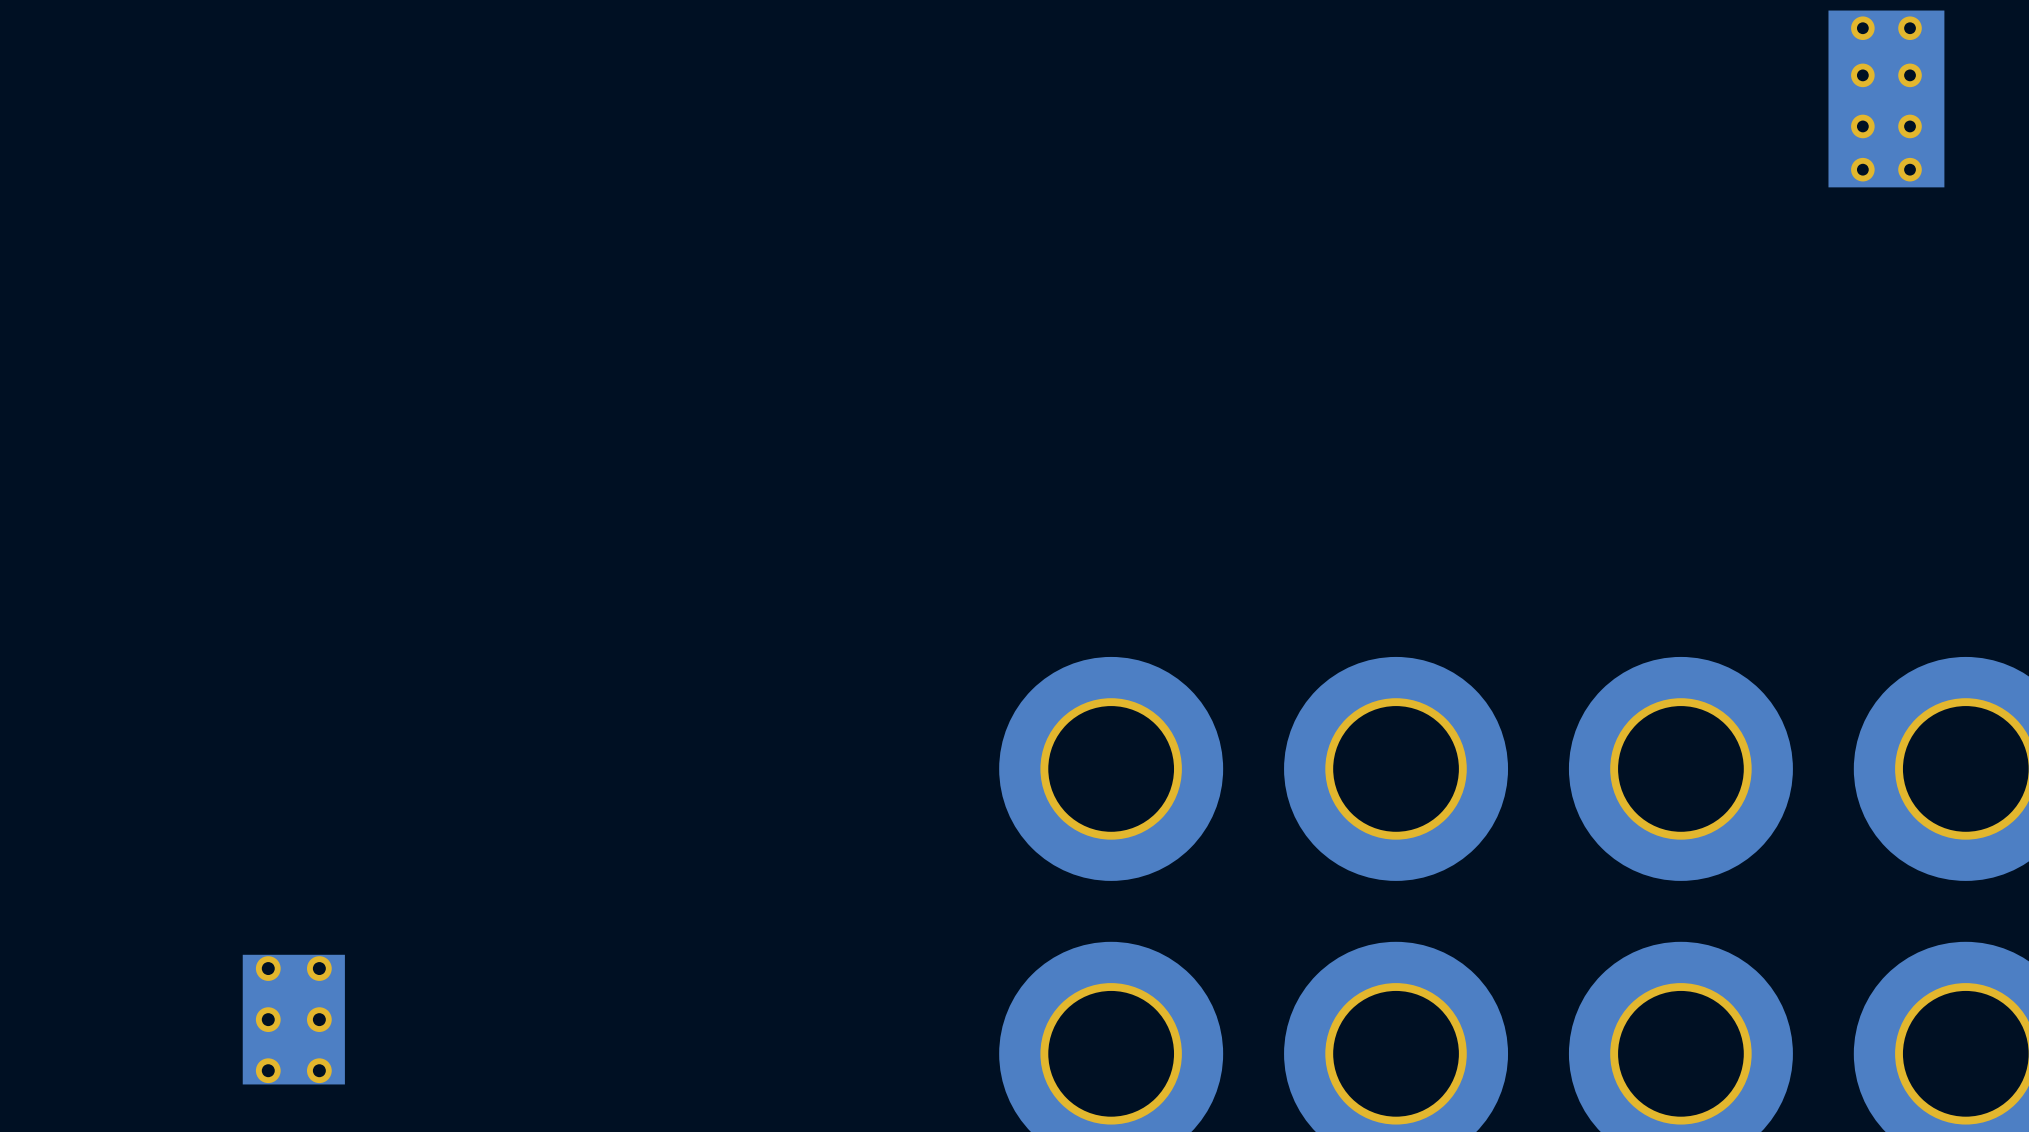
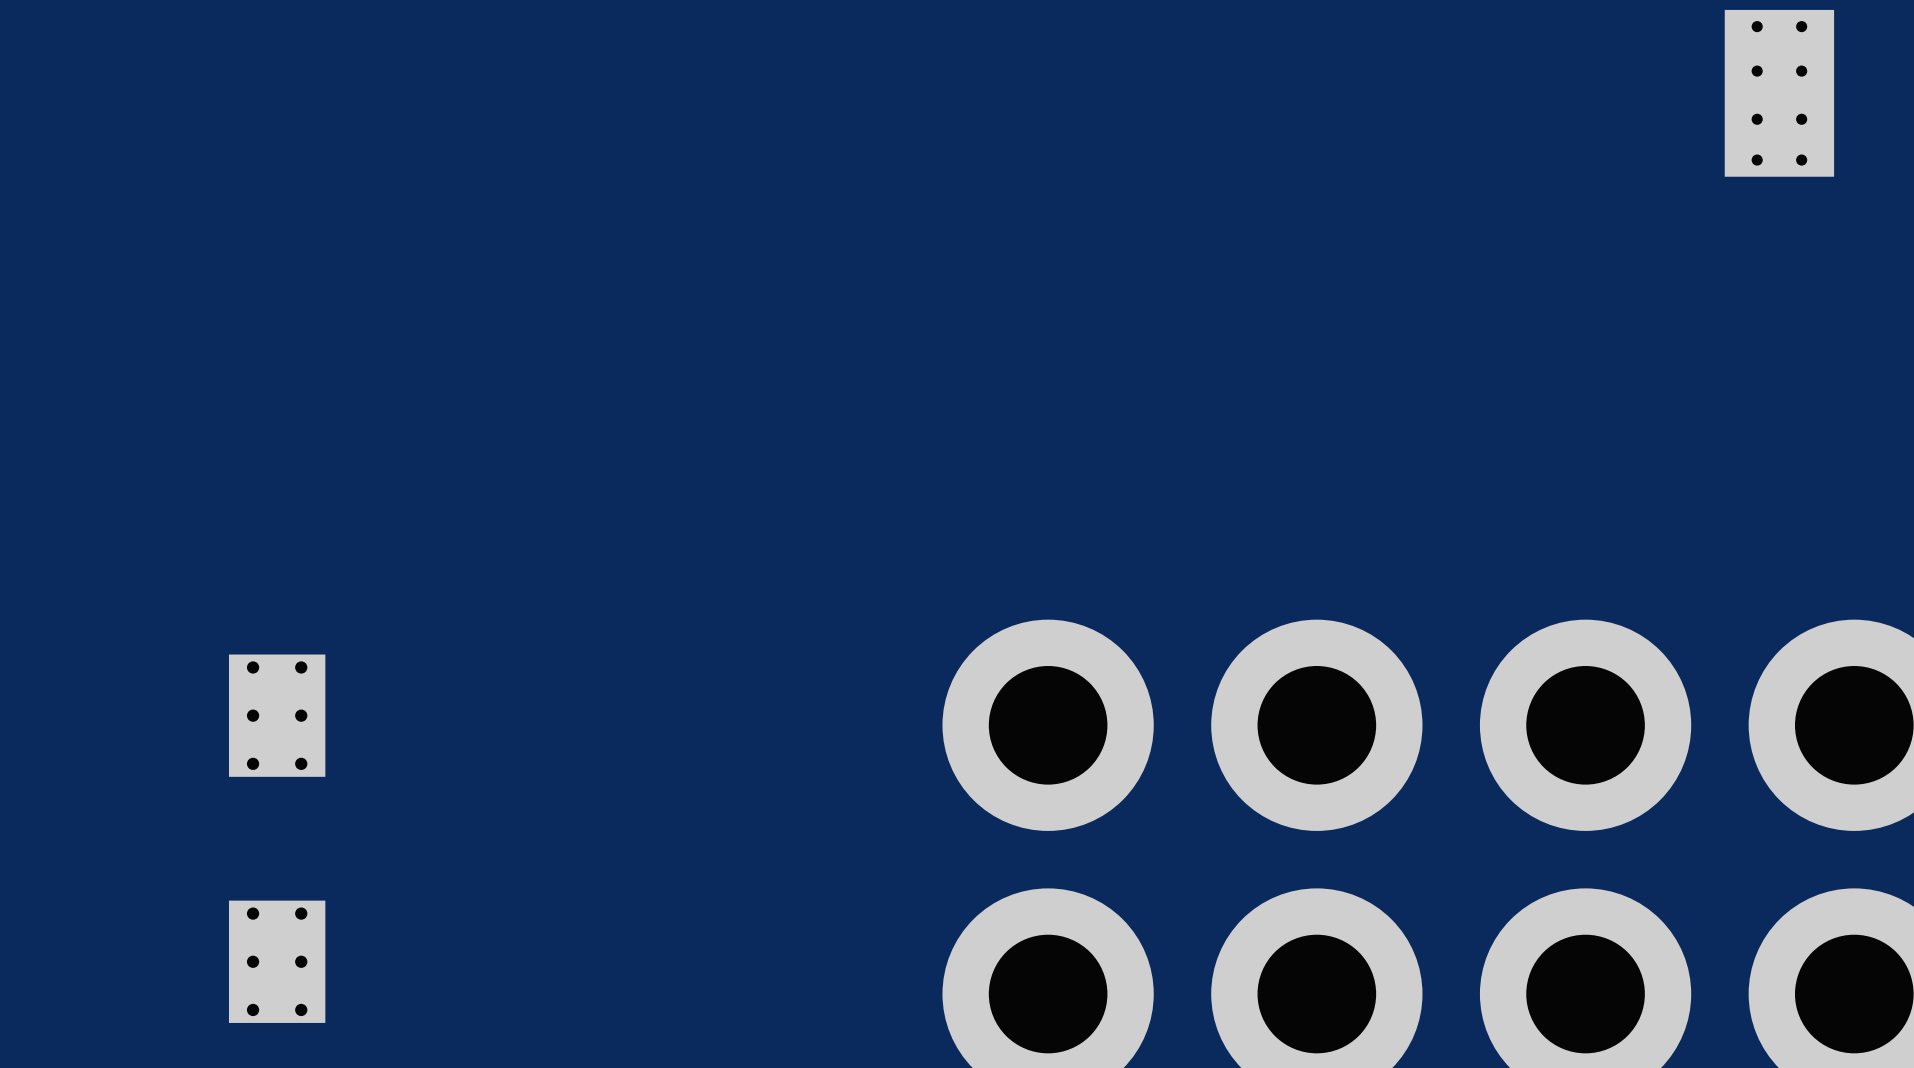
part: none -> (277, 715)

